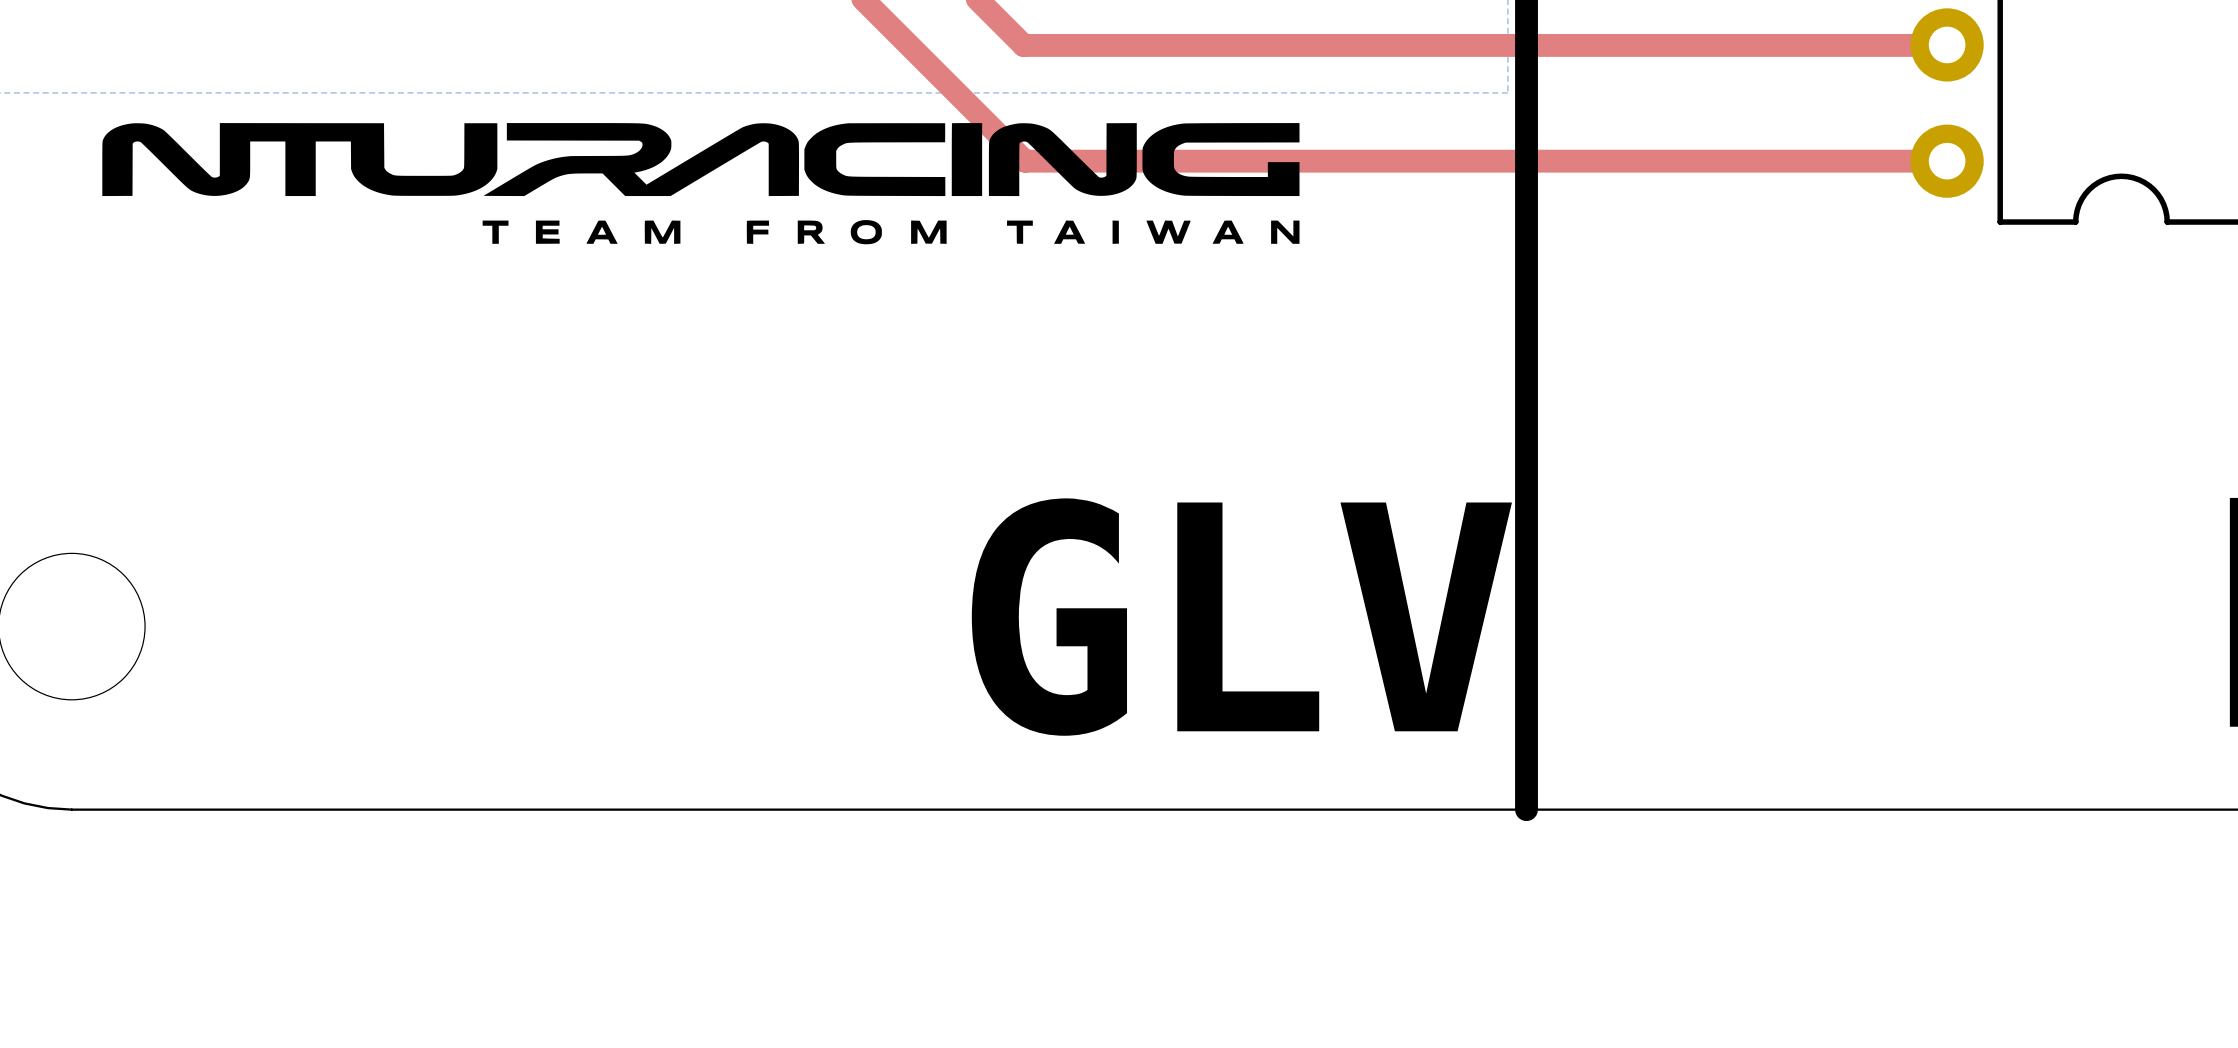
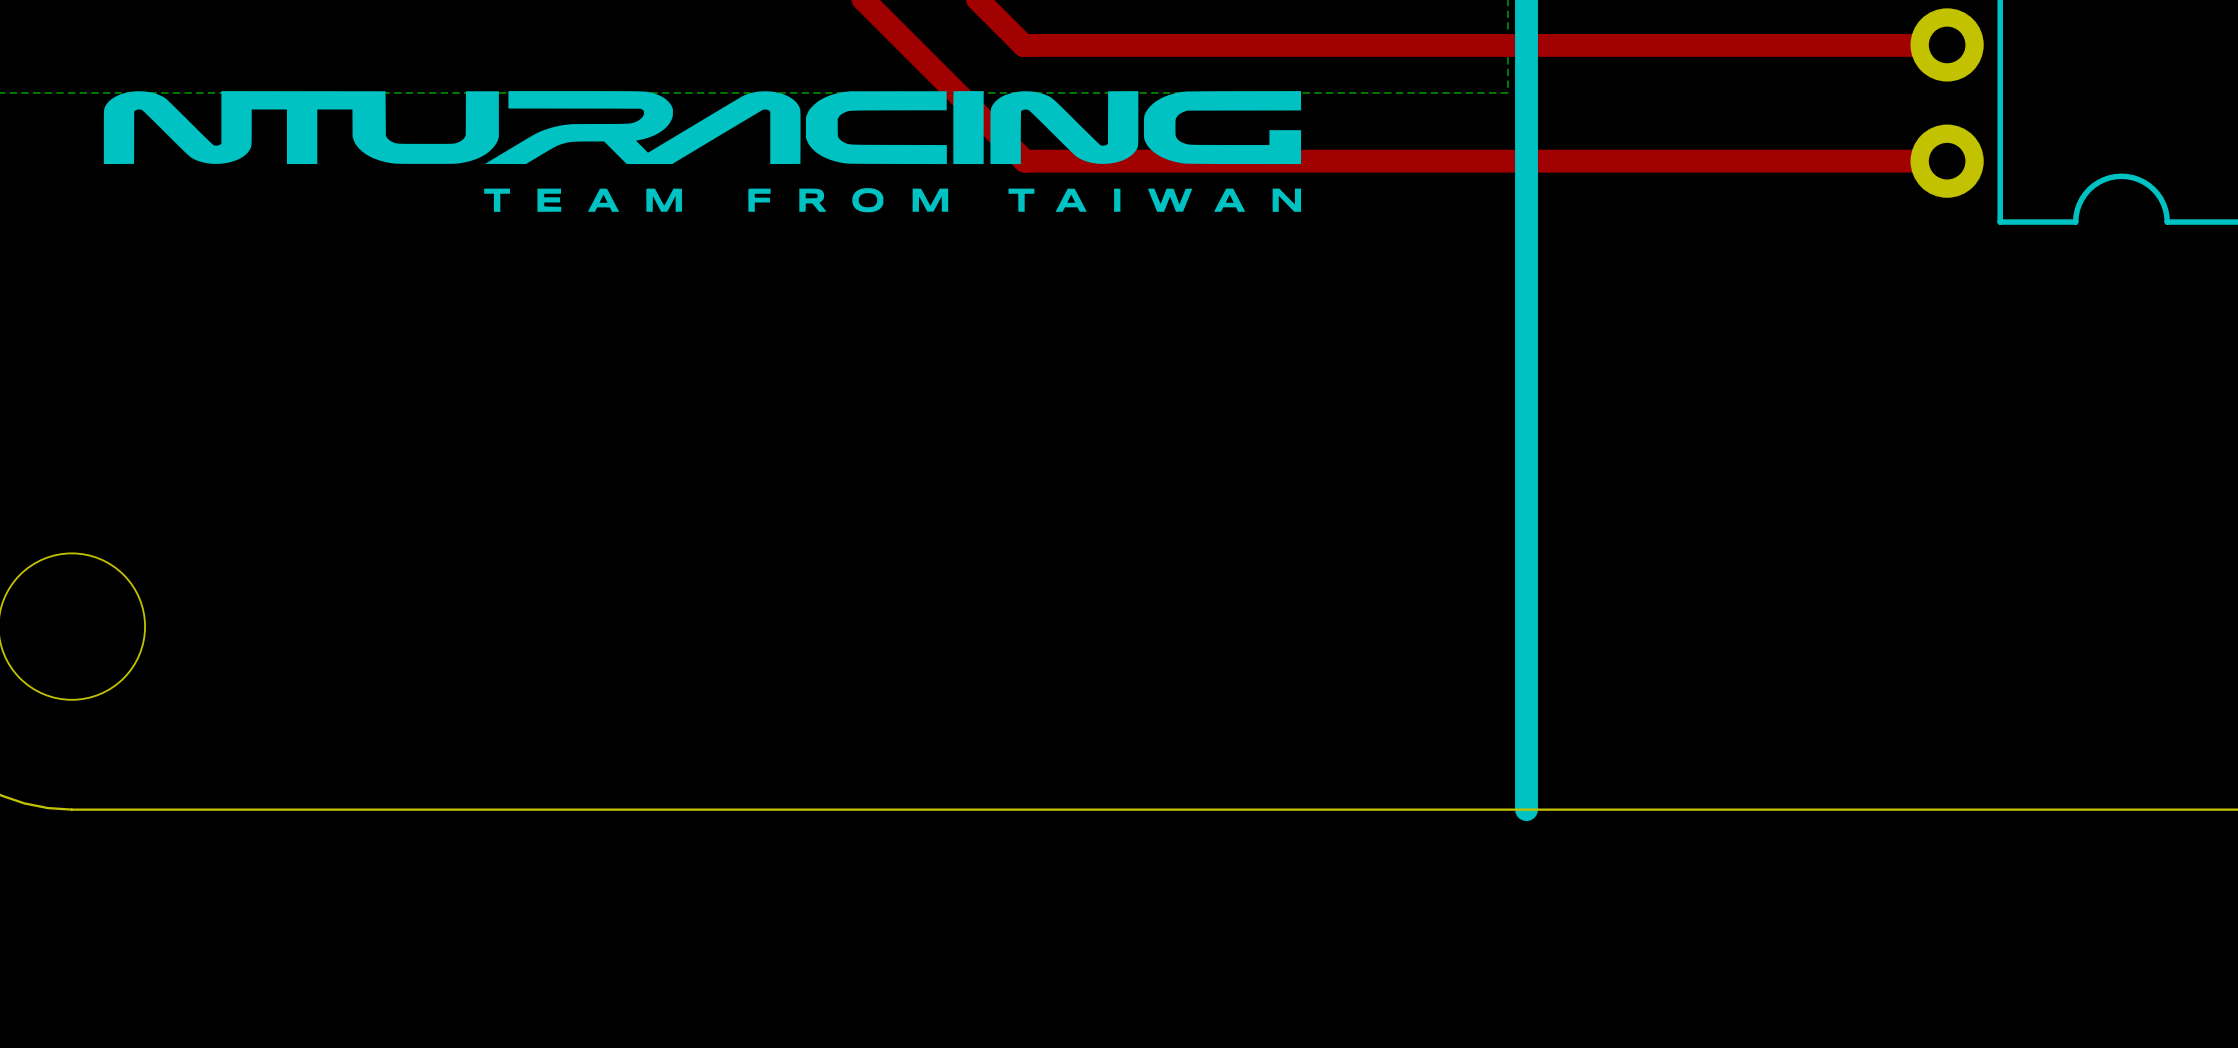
drawing position: (299, 159) -> (301, 127)
drawing position: (641, 159) -> (642, 127)
drawing position: (874, 159) -> (876, 127)
drawing position: (966, 159) -> (968, 127)
drawing position: (1062, 159) -> (1064, 127)
drawing position: (1220, 159) -> (1222, 127)
drawing position: (495, 232) -> (497, 200)
drawing position: (547, 232) -> (549, 200)
drawing position: (602, 232) -> (603, 200)
drawing position: (662, 232) -> (664, 200)
drawing position: (757, 232) -> (759, 200)
drawing position: (811, 232) -> (812, 200)
drawing position: (866, 232) -> (867, 200)
drawing position: (928, 232) -> (930, 200)
drawing position: (1019, 232) -> (1021, 200)
drawing position: (1069, 232) -> (1071, 200)
drawing position: (1115, 232) -> (1117, 200)
drawing position: (1168, 232) -> (1170, 200)
drawing position: (1228, 232) -> (1229, 200)
drawing position: (1285, 232) -> (1286, 200)
text: GLV (1241, 617) -> none

